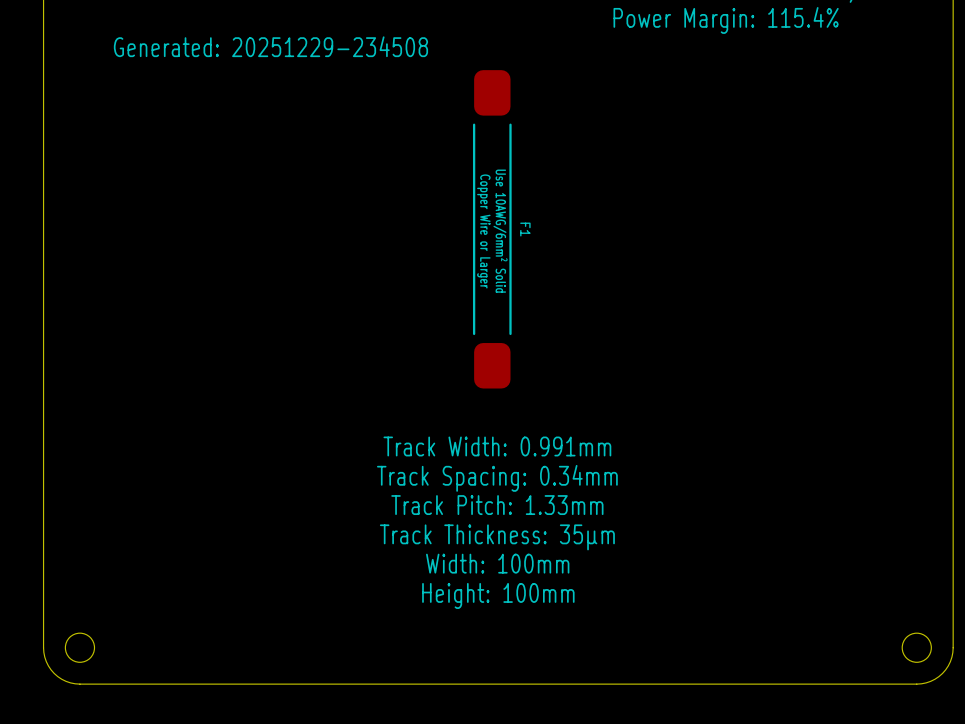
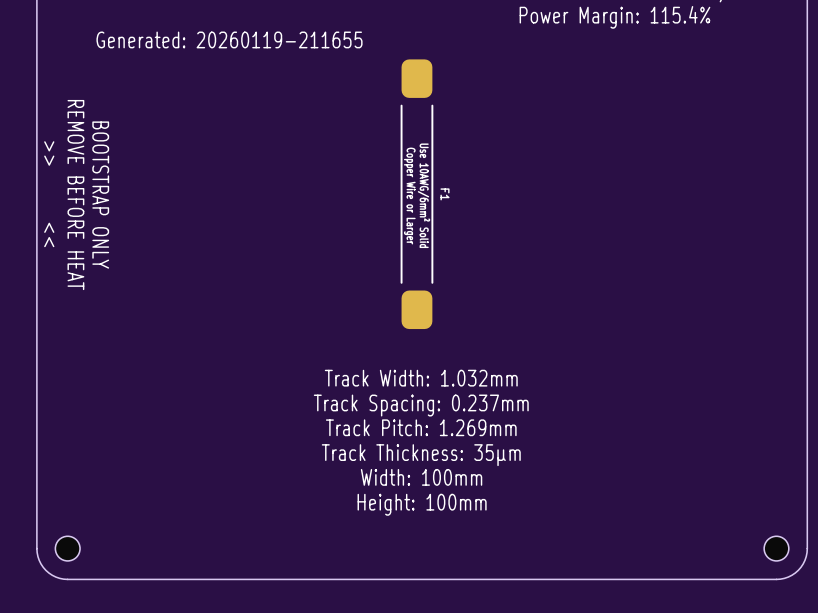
text: Generated: 20251229-234508 (270, 46) -> Generated: 20260119-211655 (229, 39)
text: none -> >> << (49, 194)
text: none -> REMOVE BEFORE HEAT (75, 195)
text: none -> BOOTSTRAP ONLY (100, 195)
text: Track Width: 0.991mm (497, 446) -> Track Width: 1.032mm (421, 378)
text: Track Spacing: 0.34mm (497, 478) -> Track Spacing: 0.237mm (421, 405)
text: Track Pitch: 1.33mm (497, 505) -> Track Pitch: 1.269mm (421, 427)

